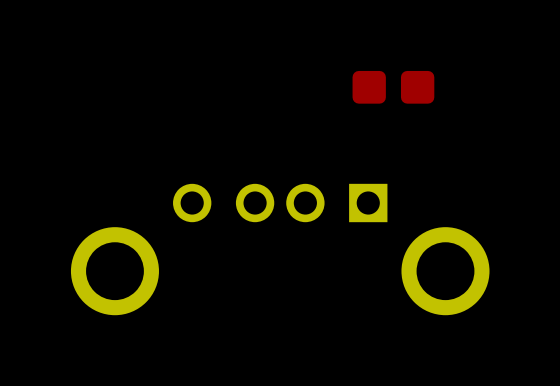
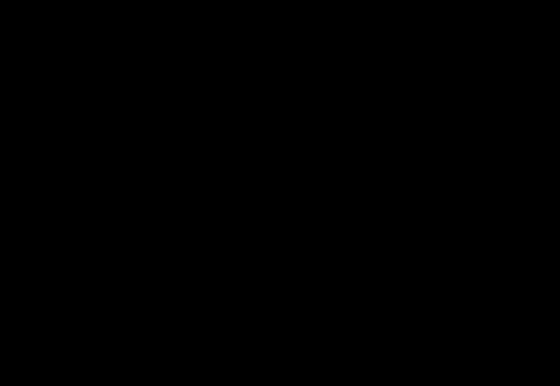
part: (393, 87) -> none
part: (280, 249) -> none

